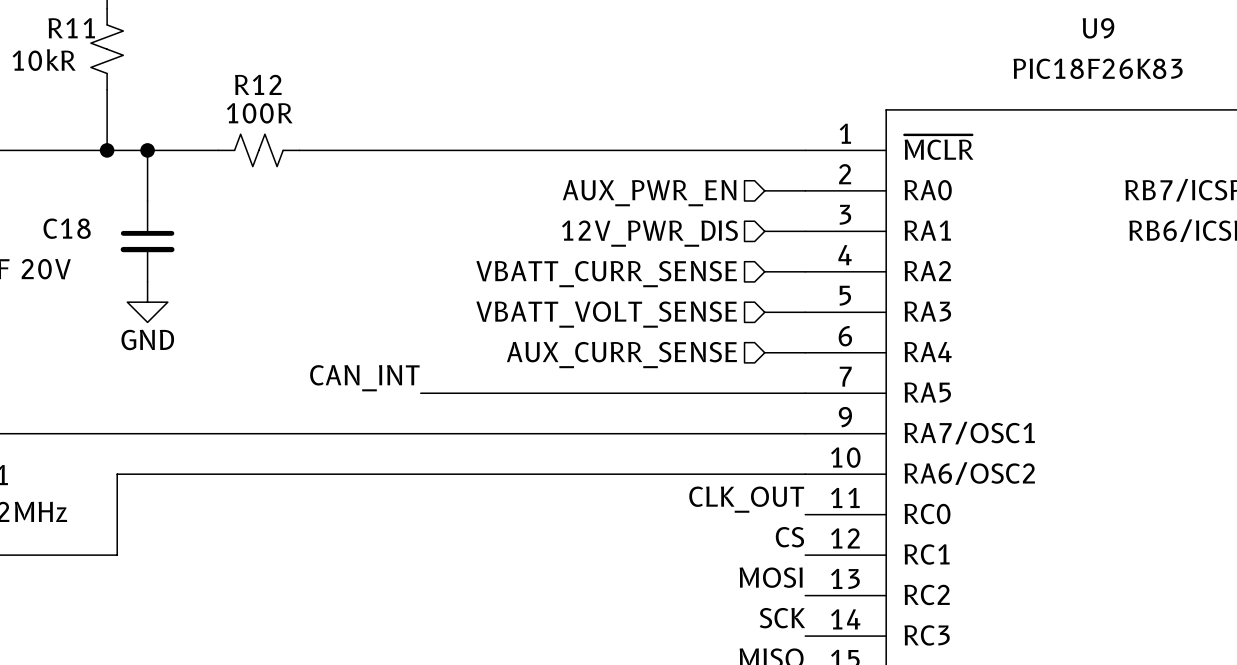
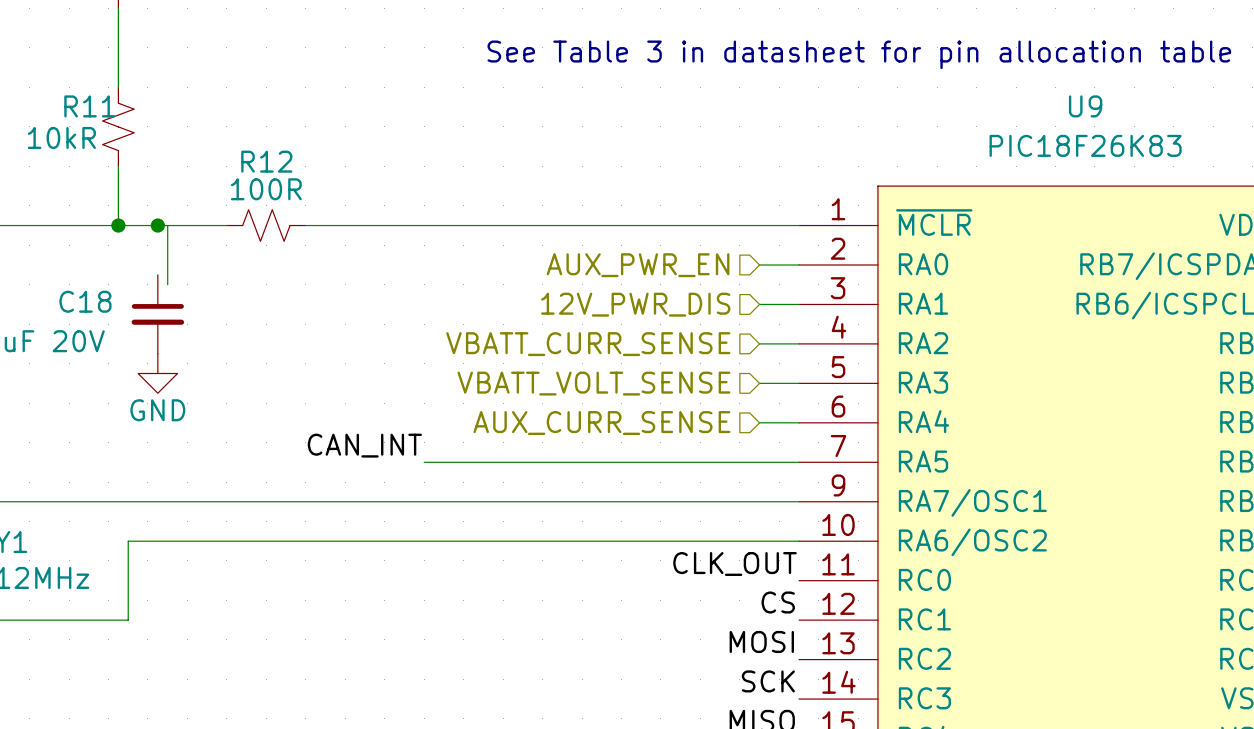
wire: (147, 150) (147, 200) -> none
wire: none -> (167, 225) (167, 284)

